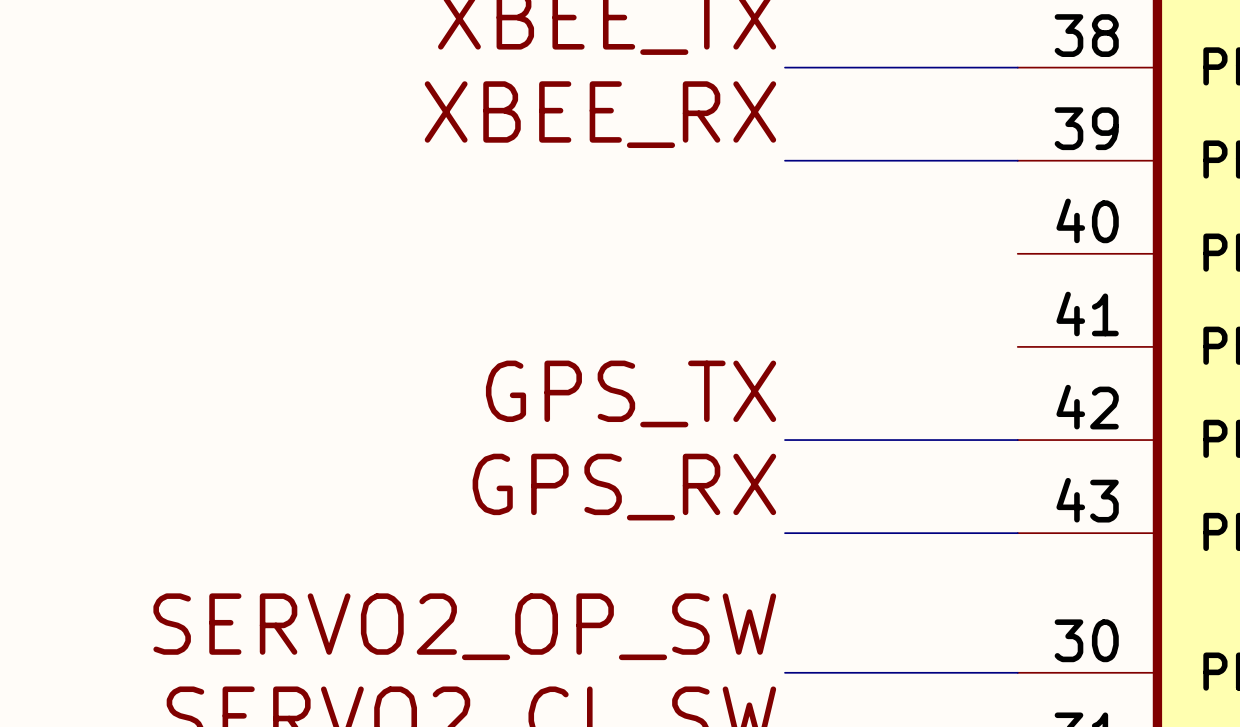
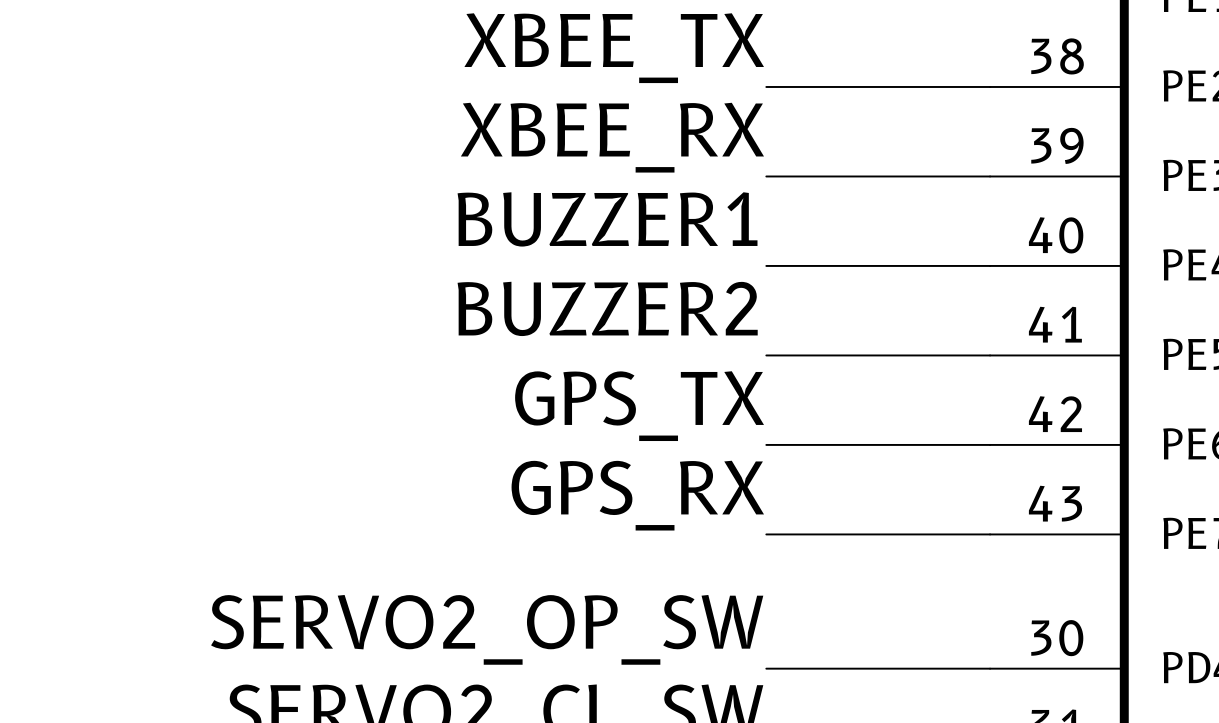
label: none -> BUZZER1 (607, 219)
wire: none -> (766, 265) (990, 265)
label: none -> BUZZER2 (607, 308)
wire: none -> (766, 355) (990, 355)

